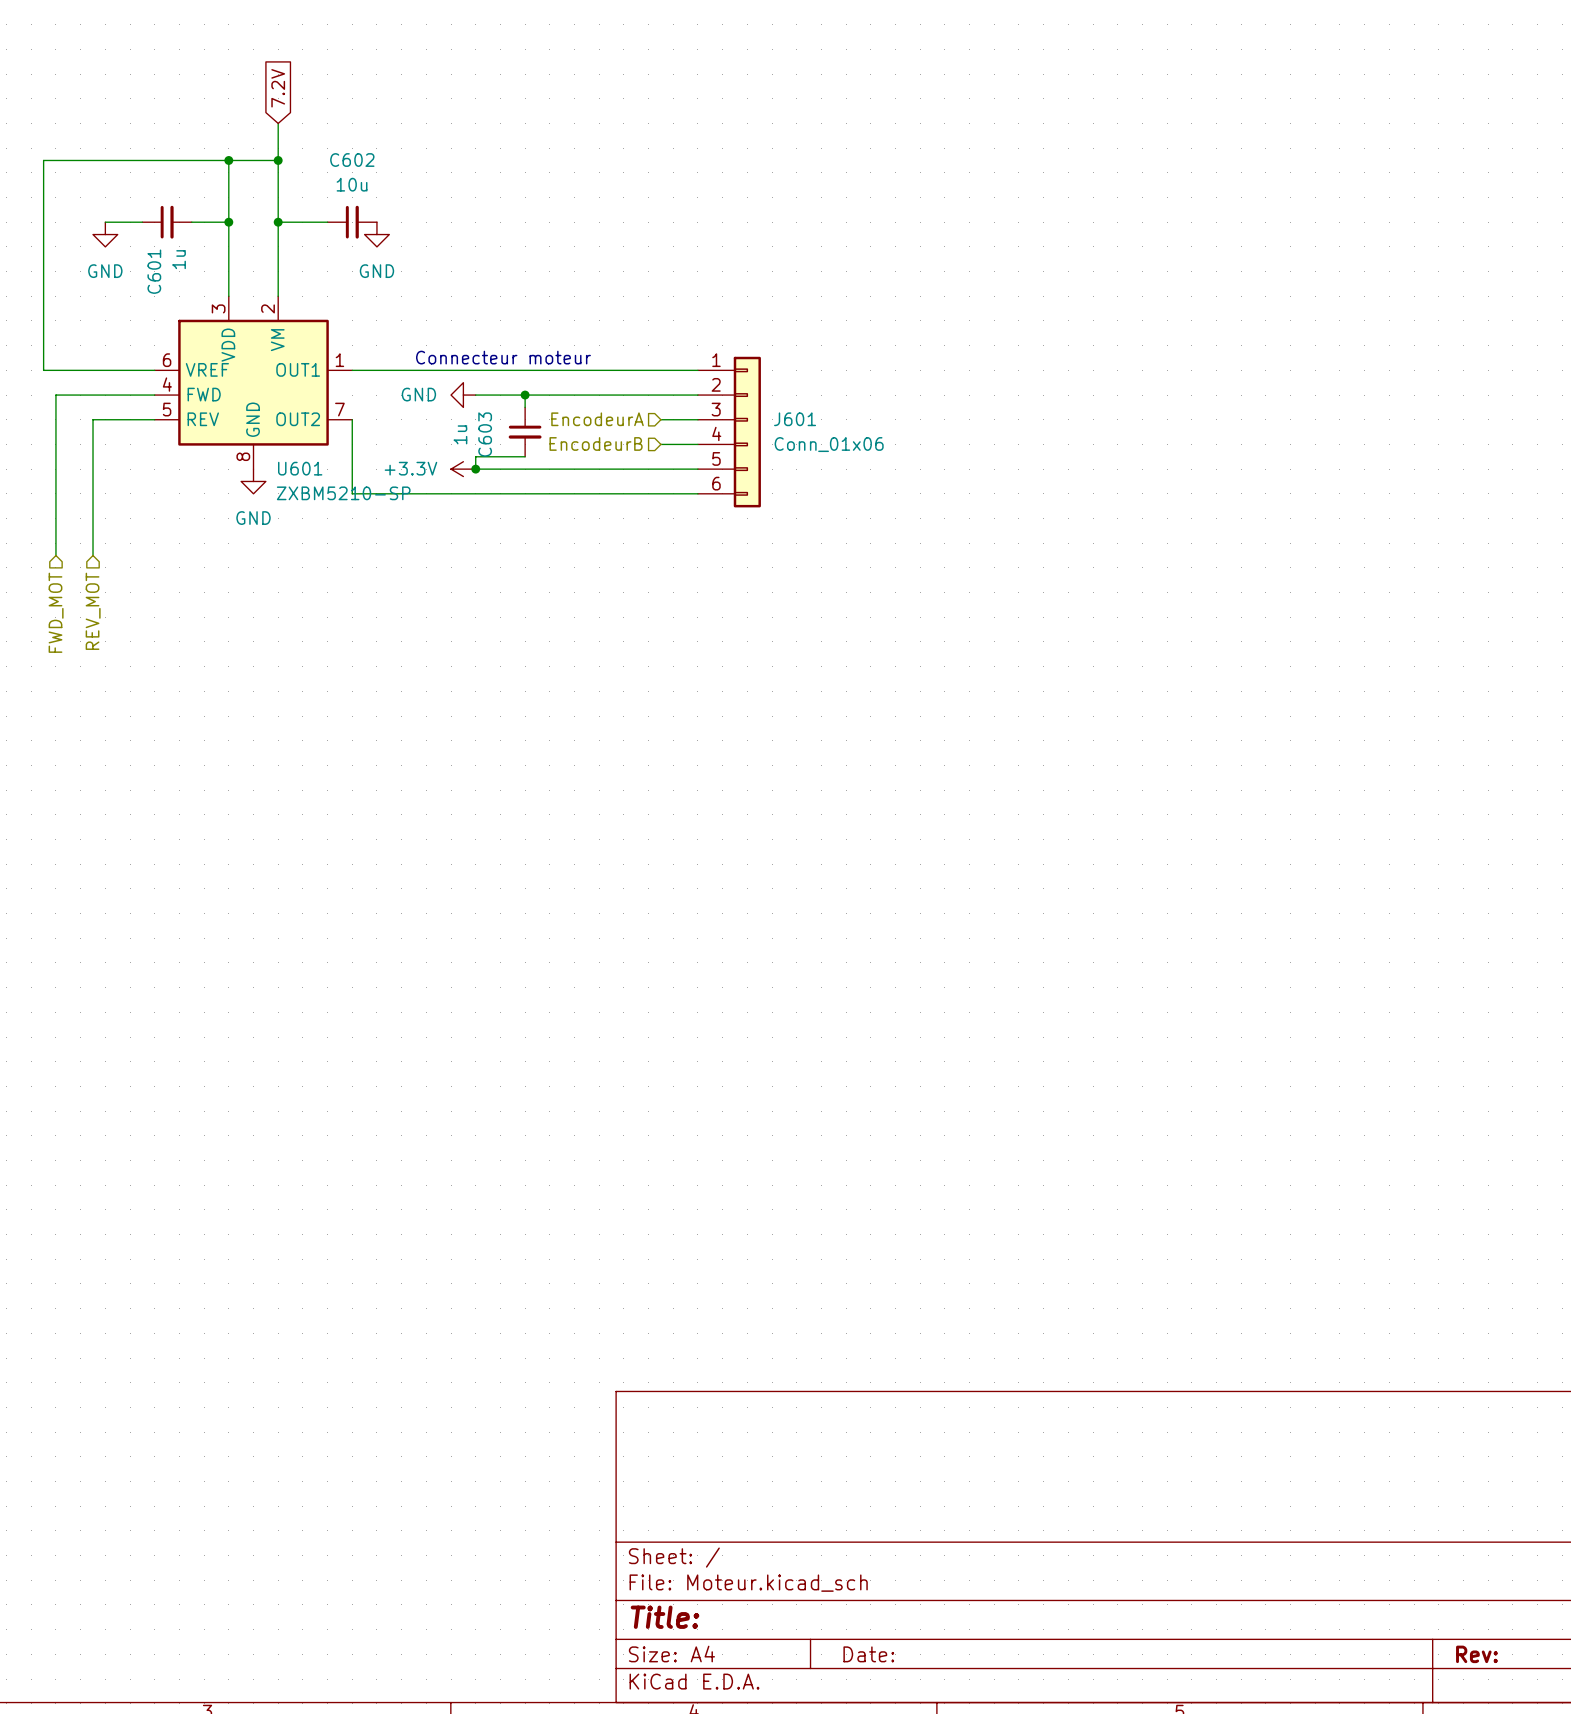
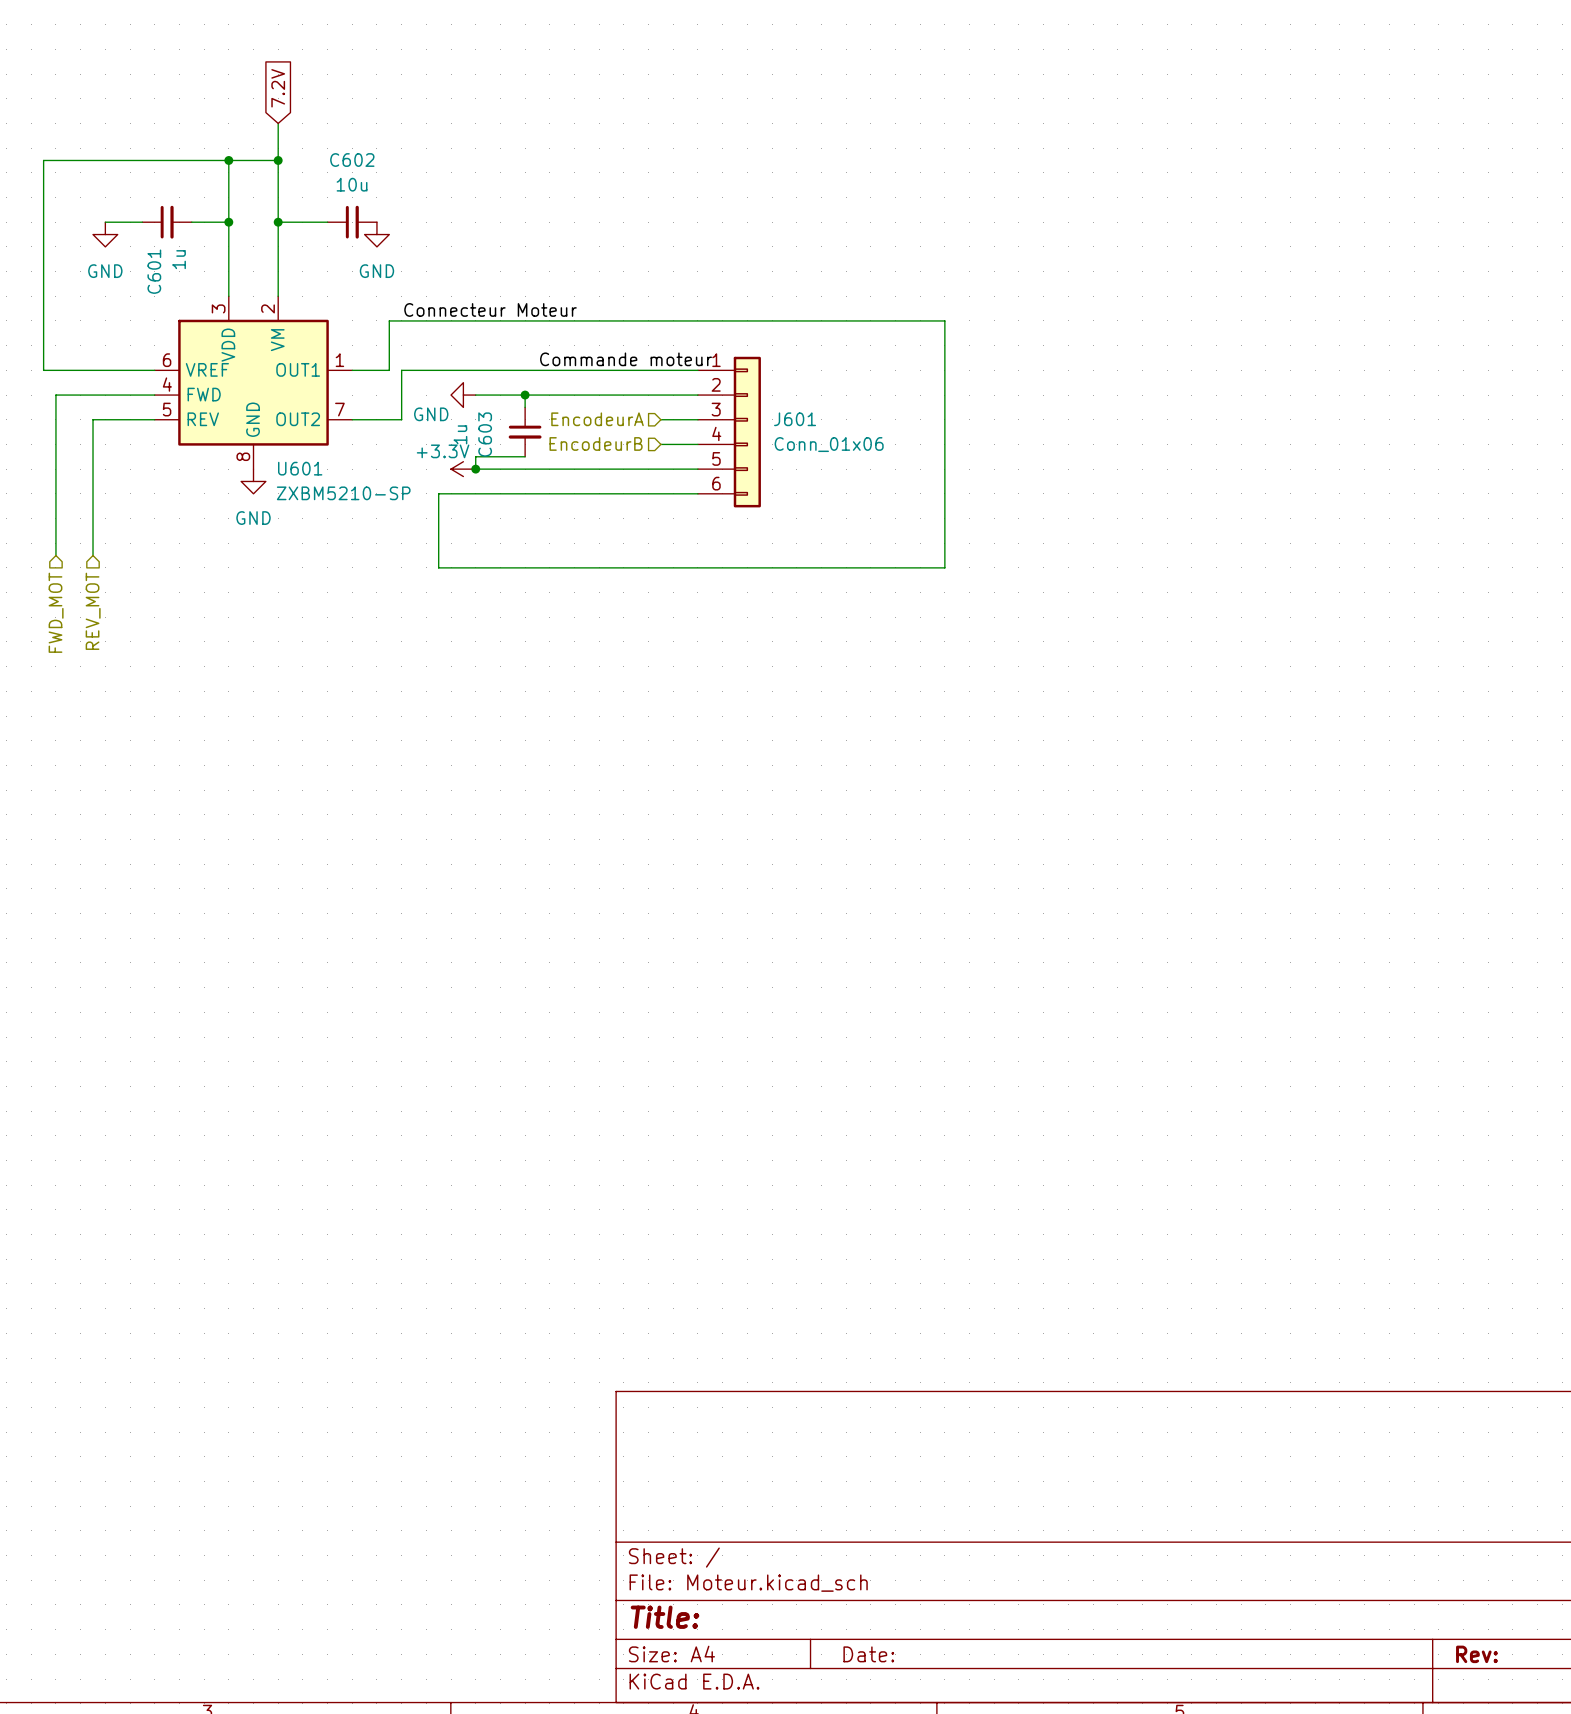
label: none -> Connecteur Moteur (490, 309)
text: Connecteur moteur (503, 357) -> none
label: none -> Commande moteur (626, 359)
wire: (389, 370) (401, 370) -> (352, 419) (401, 419) (401, 370)
power symbol text position: GND (418, 394) -> GND (431, 414)
wire: (352, 419) (352, 493) (438, 493) -> (389, 370) (389, 320) (944, 320) (944, 567) (438, 567) (438, 493)
power symbol text position: +3.3V (410, 468) -> +3.3V (443, 451)

